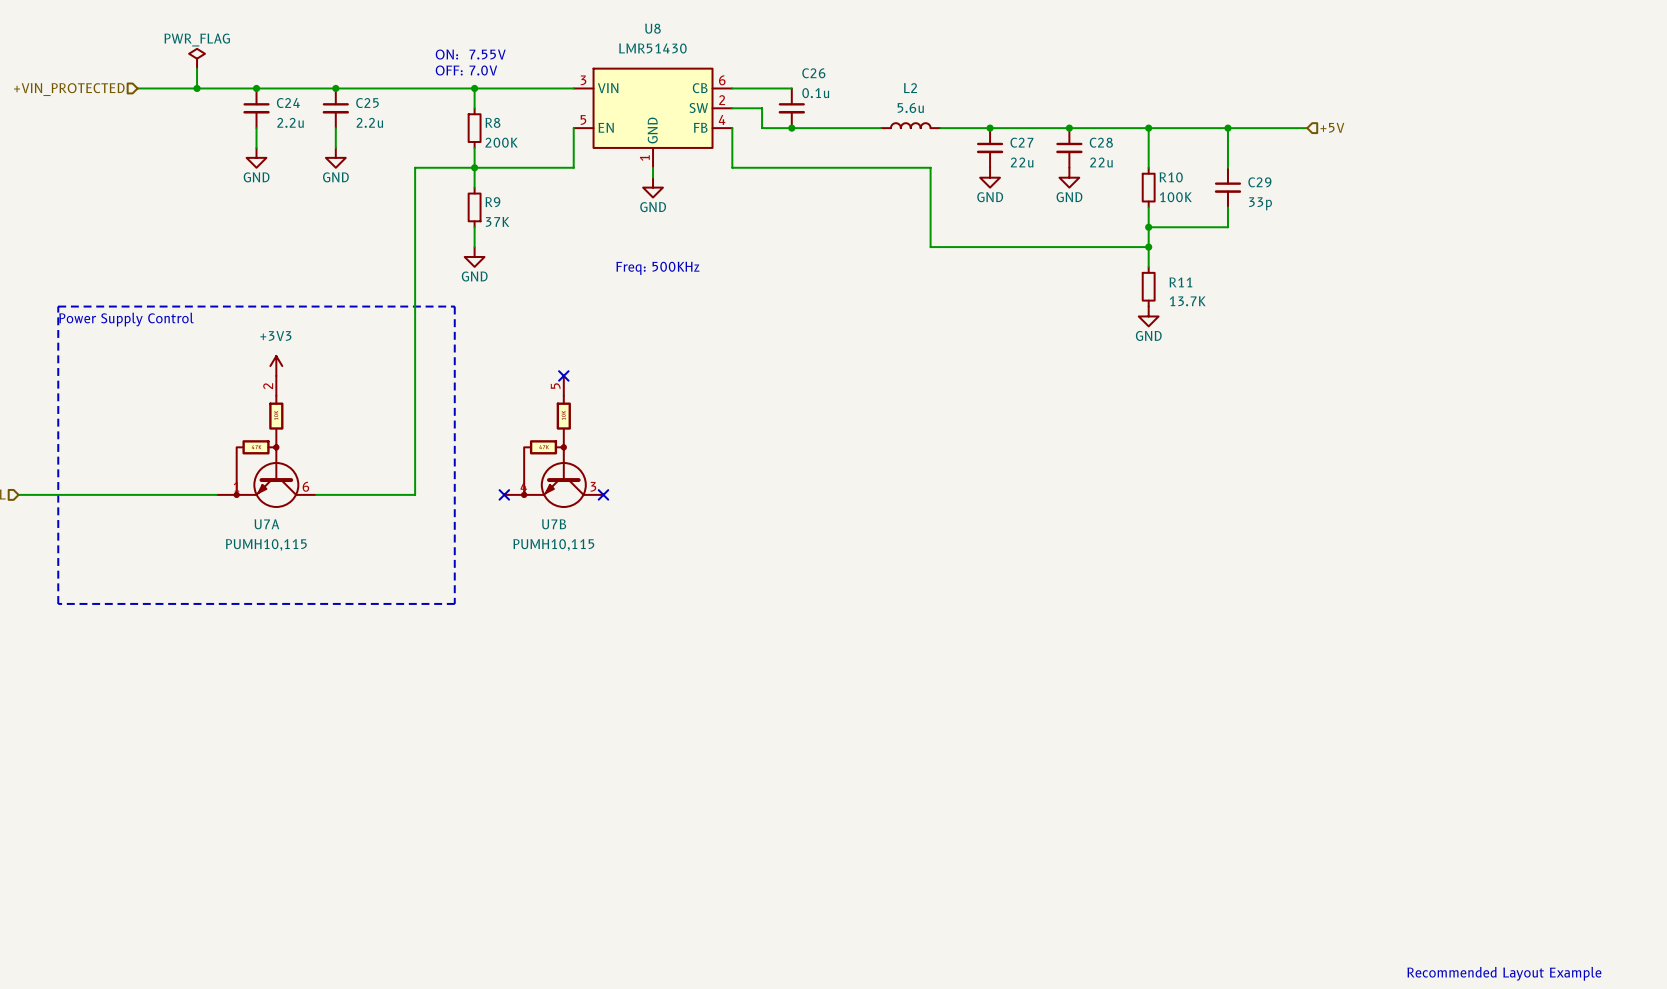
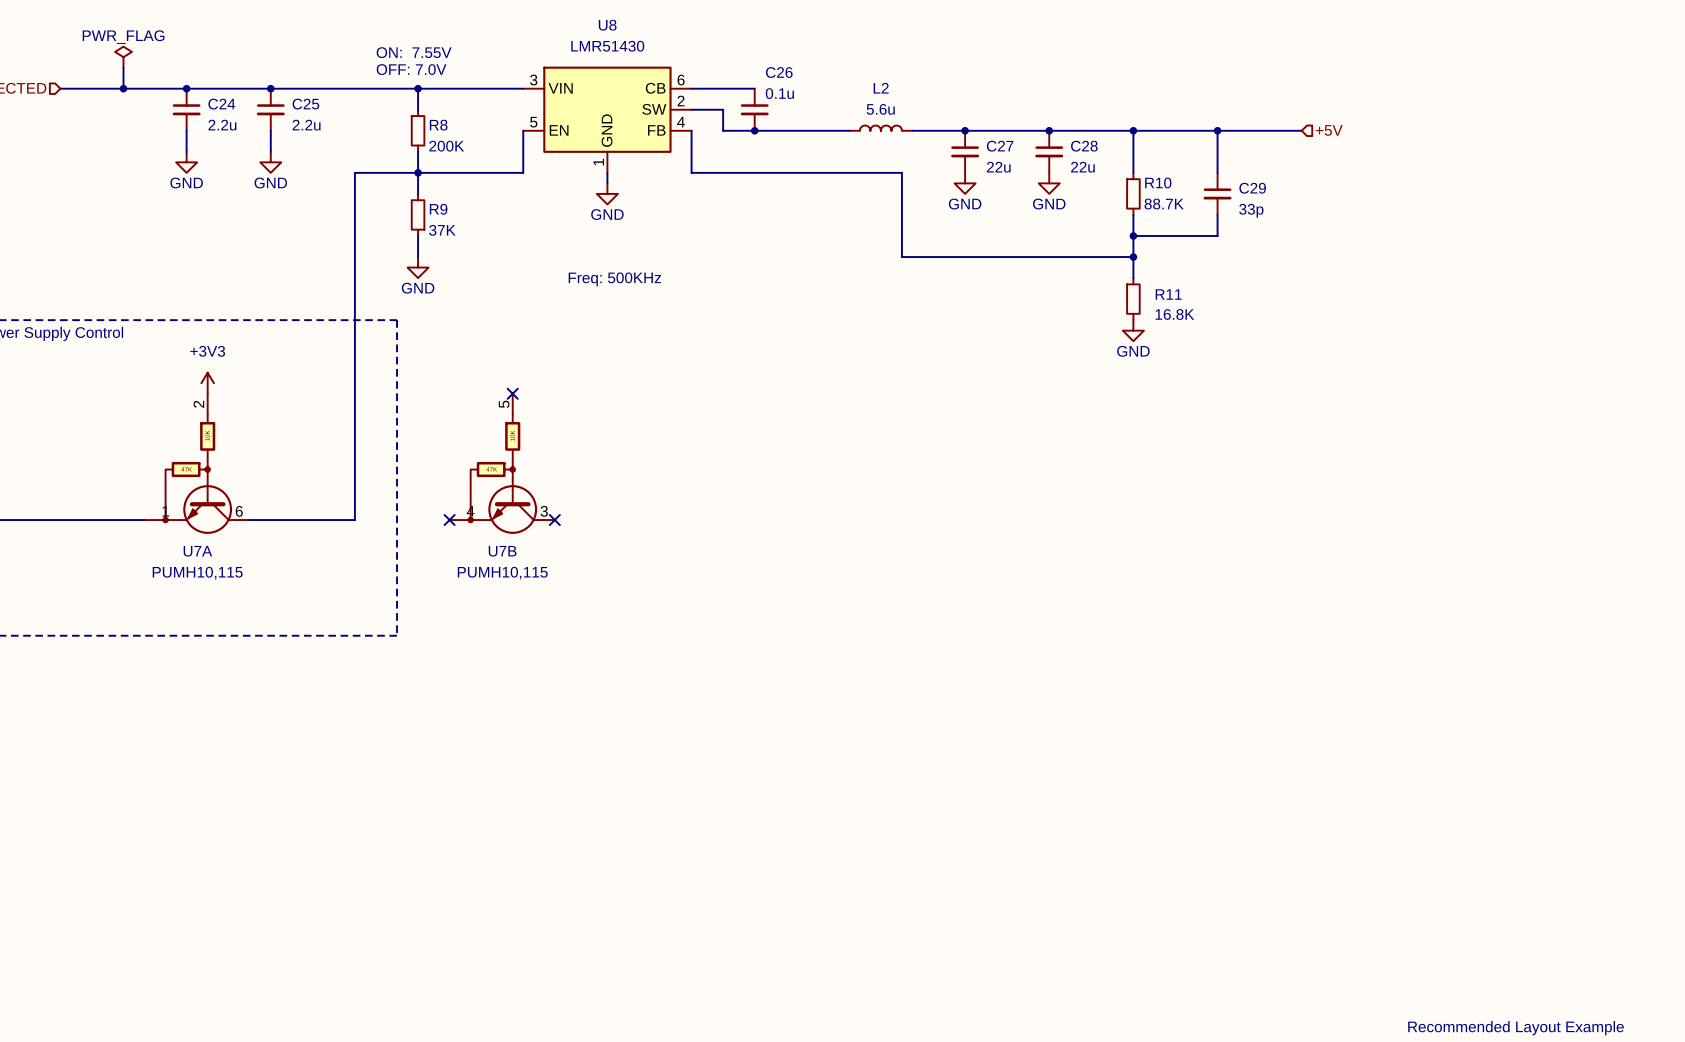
R10 value: 100K (1175, 197) -> 88.7K (1164, 204)
R11 value: 13.7K (1187, 301) -> 16.8K (1174, 314)

